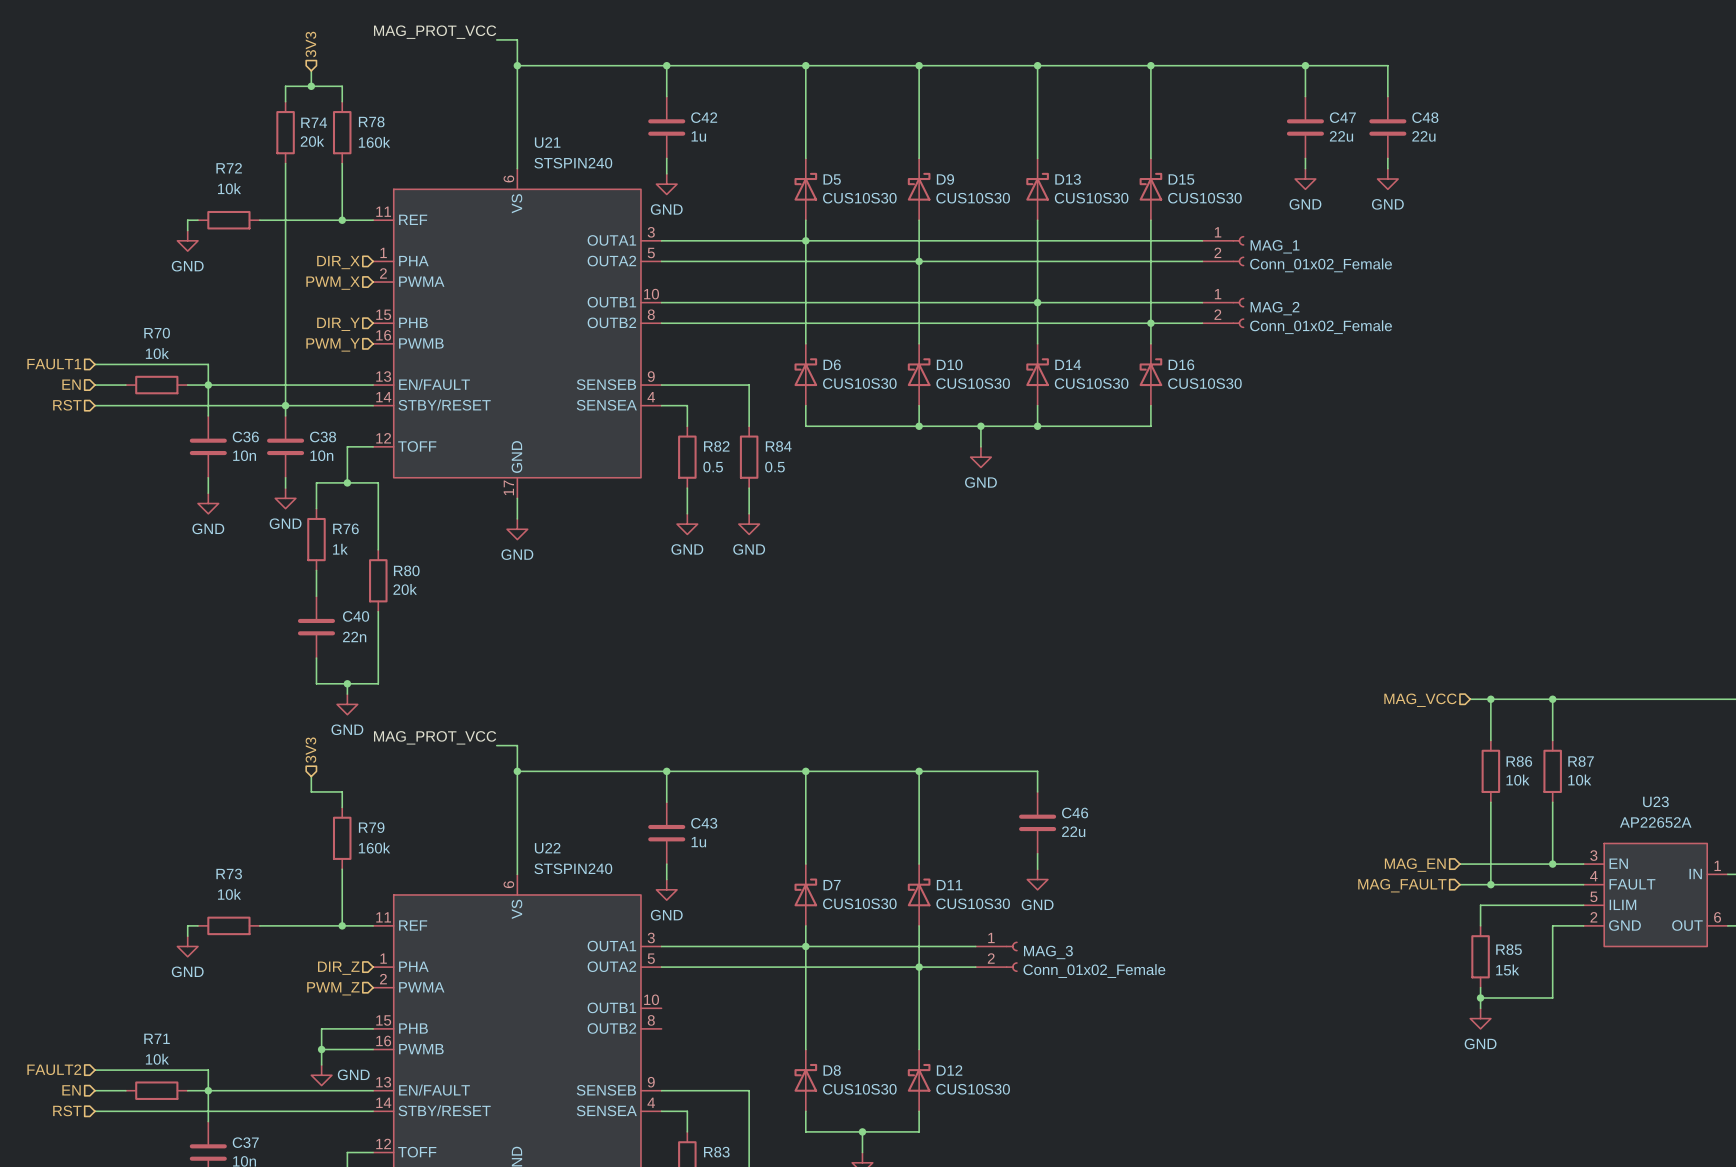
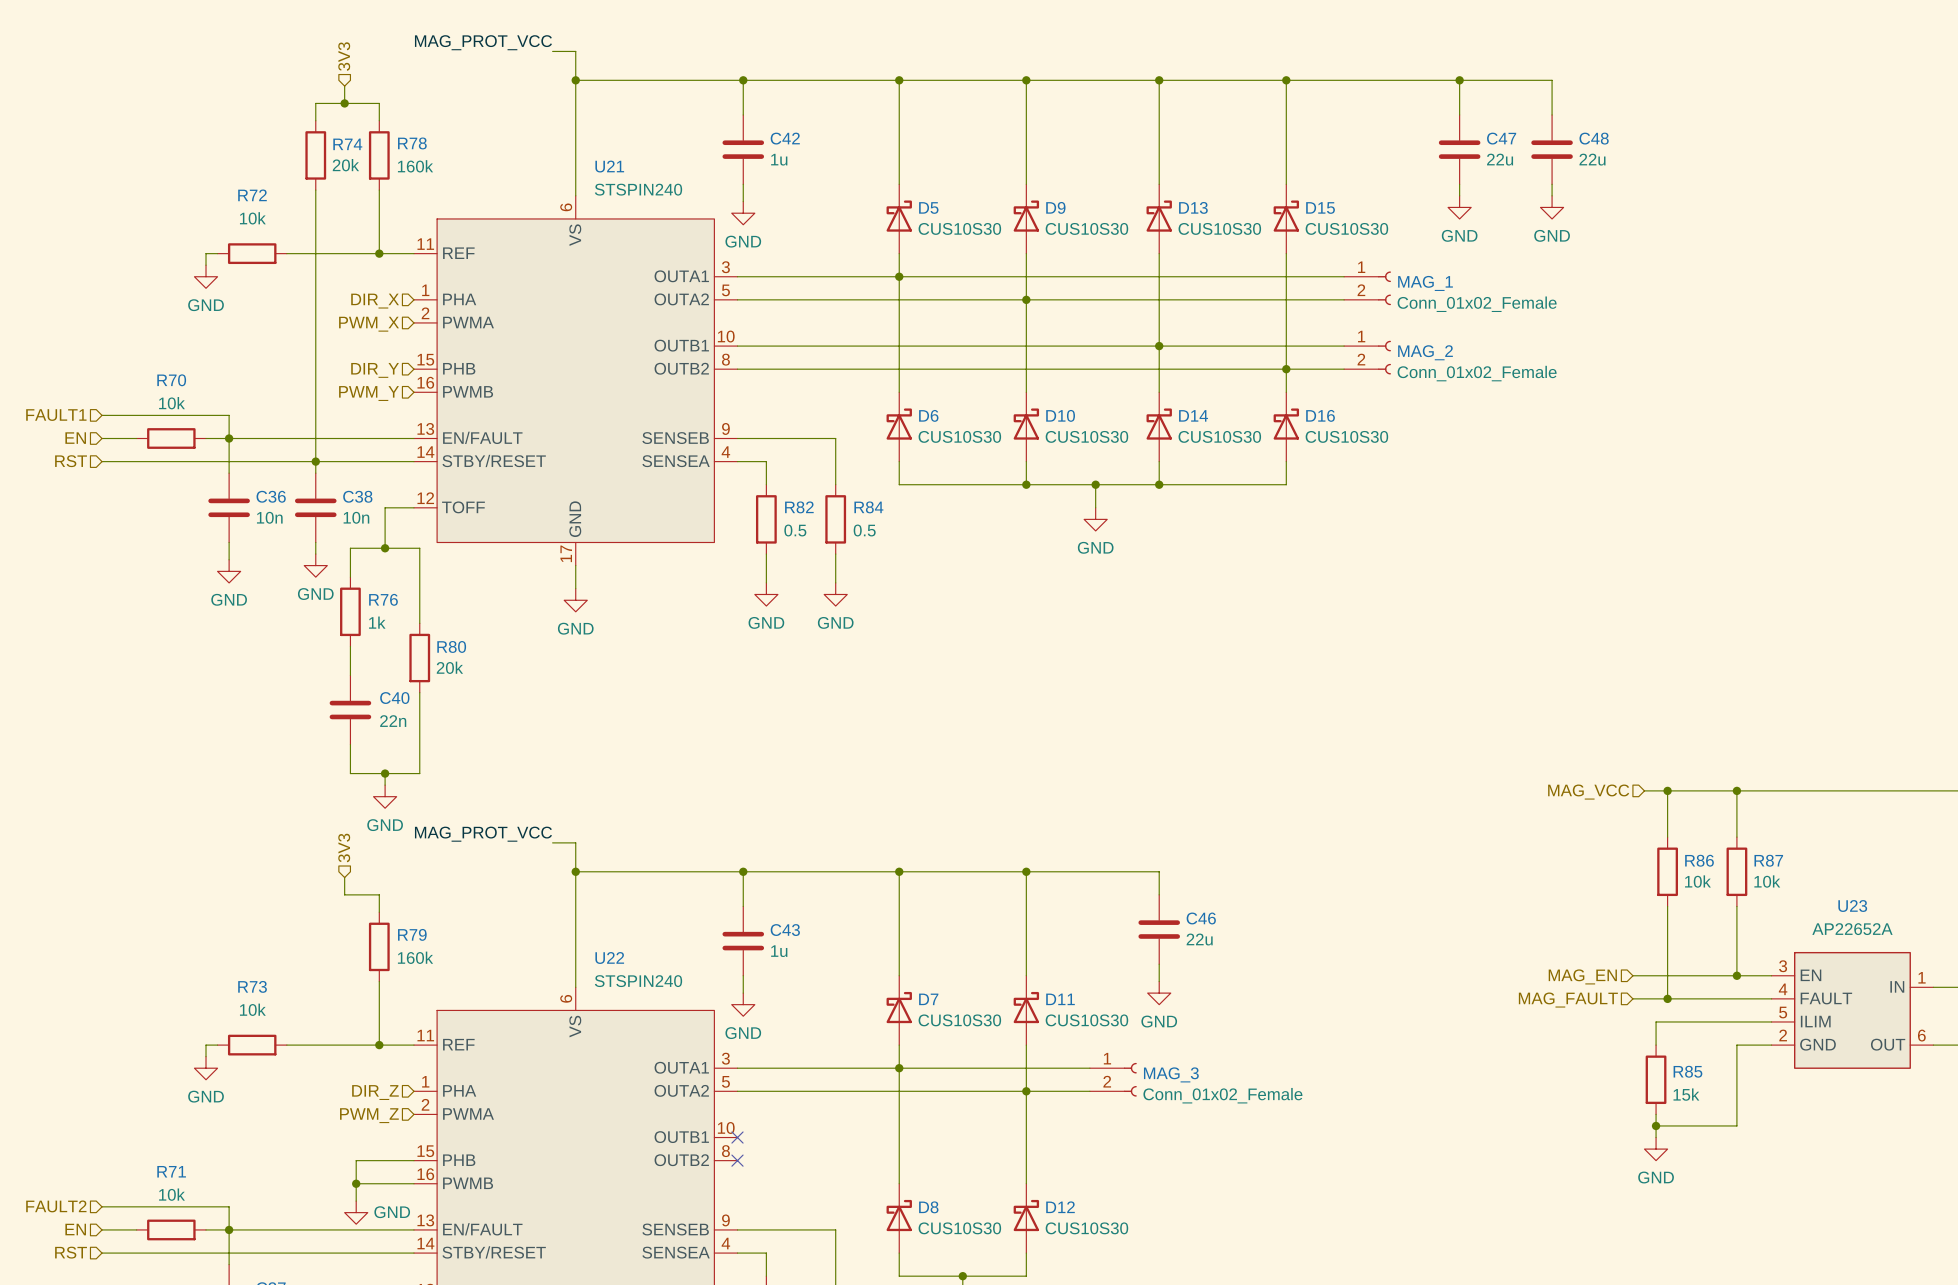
no-connect mark: none -> (737, 1137)
no-connect mark: none -> (737, 1160)

